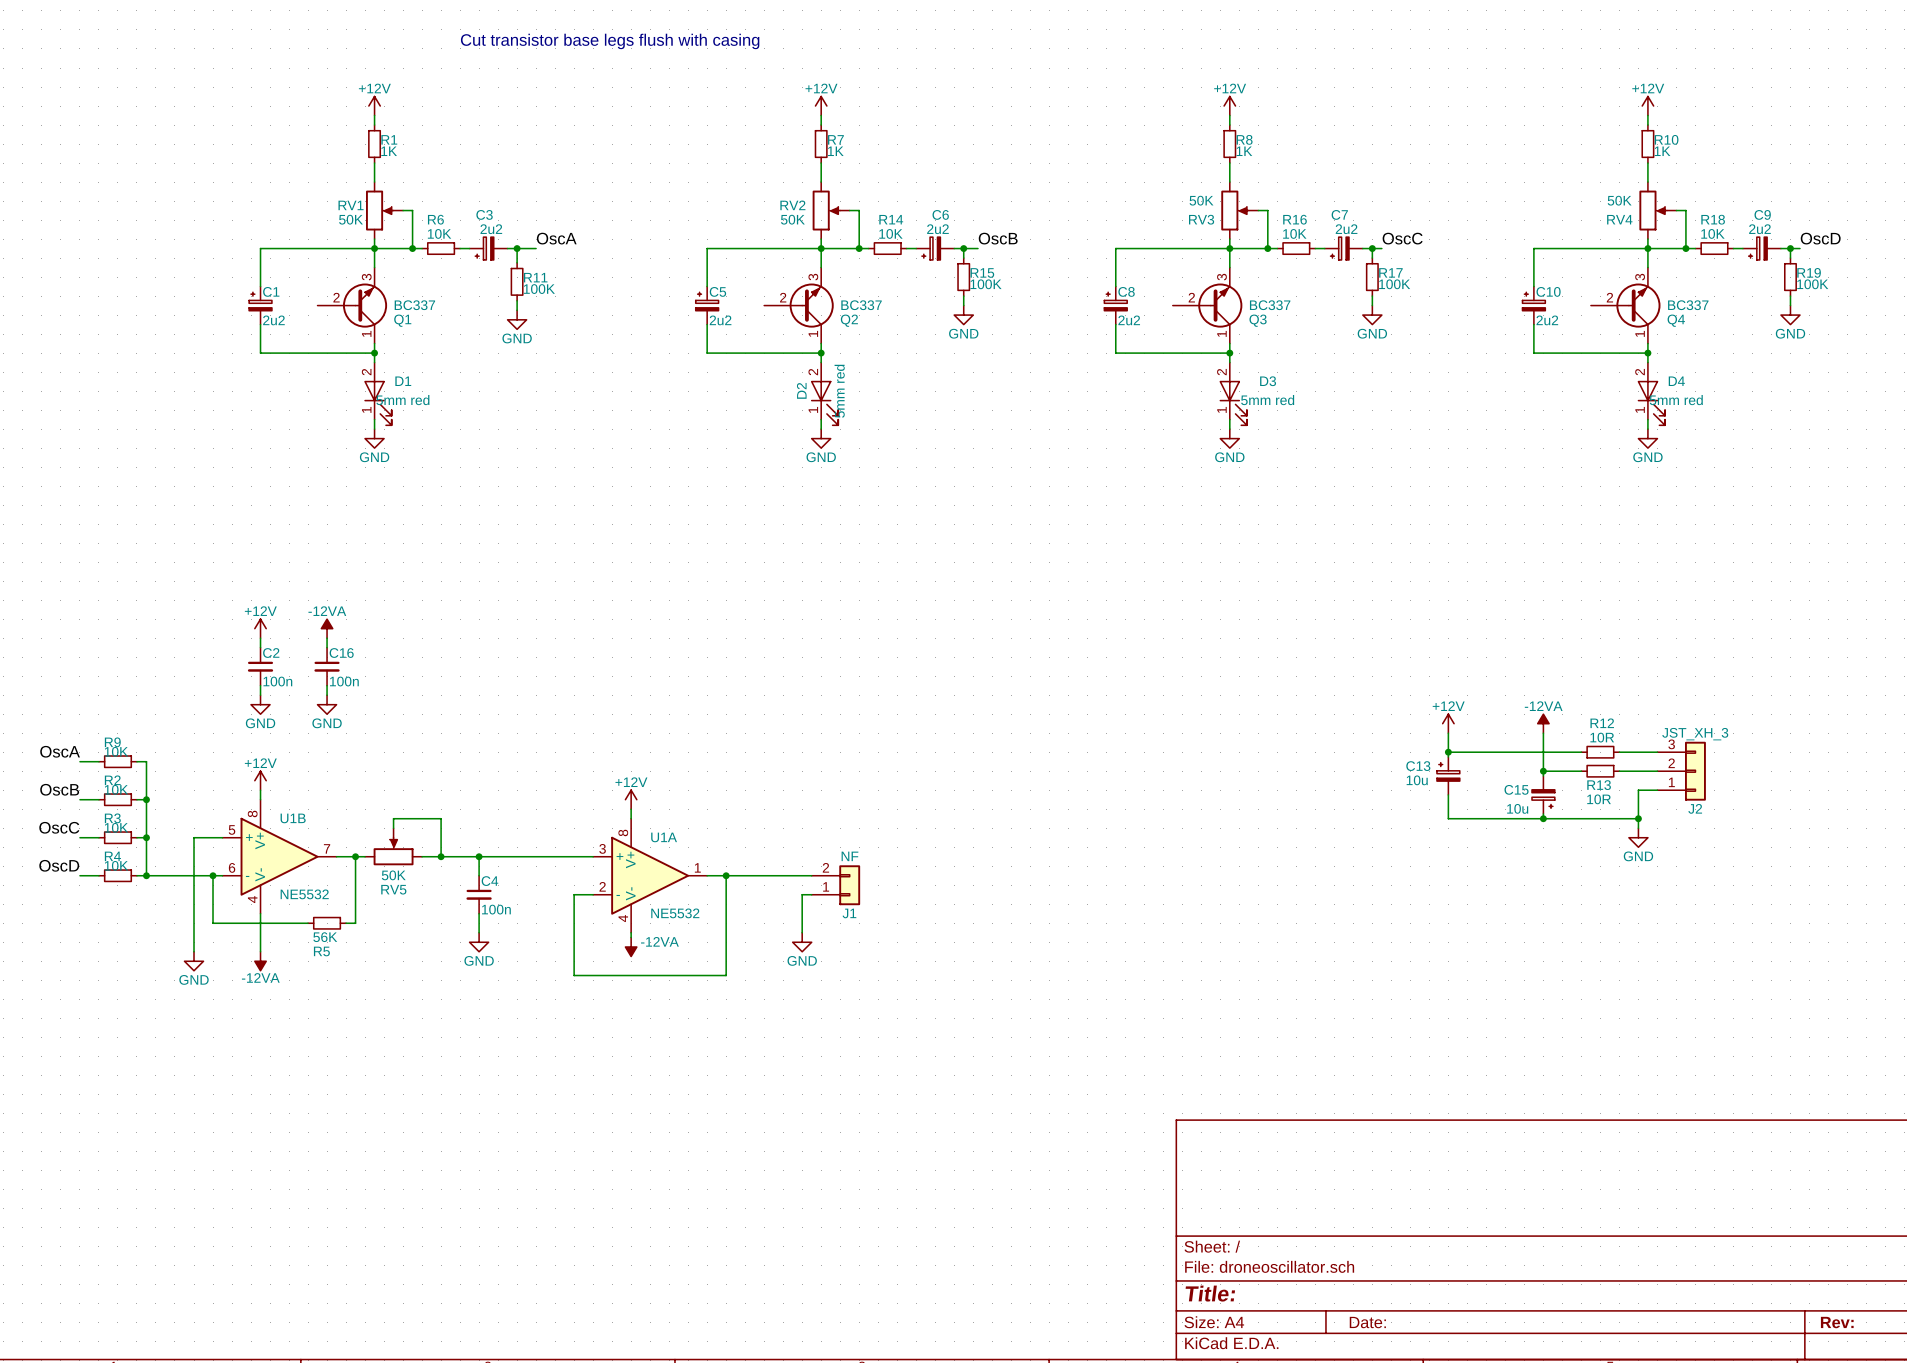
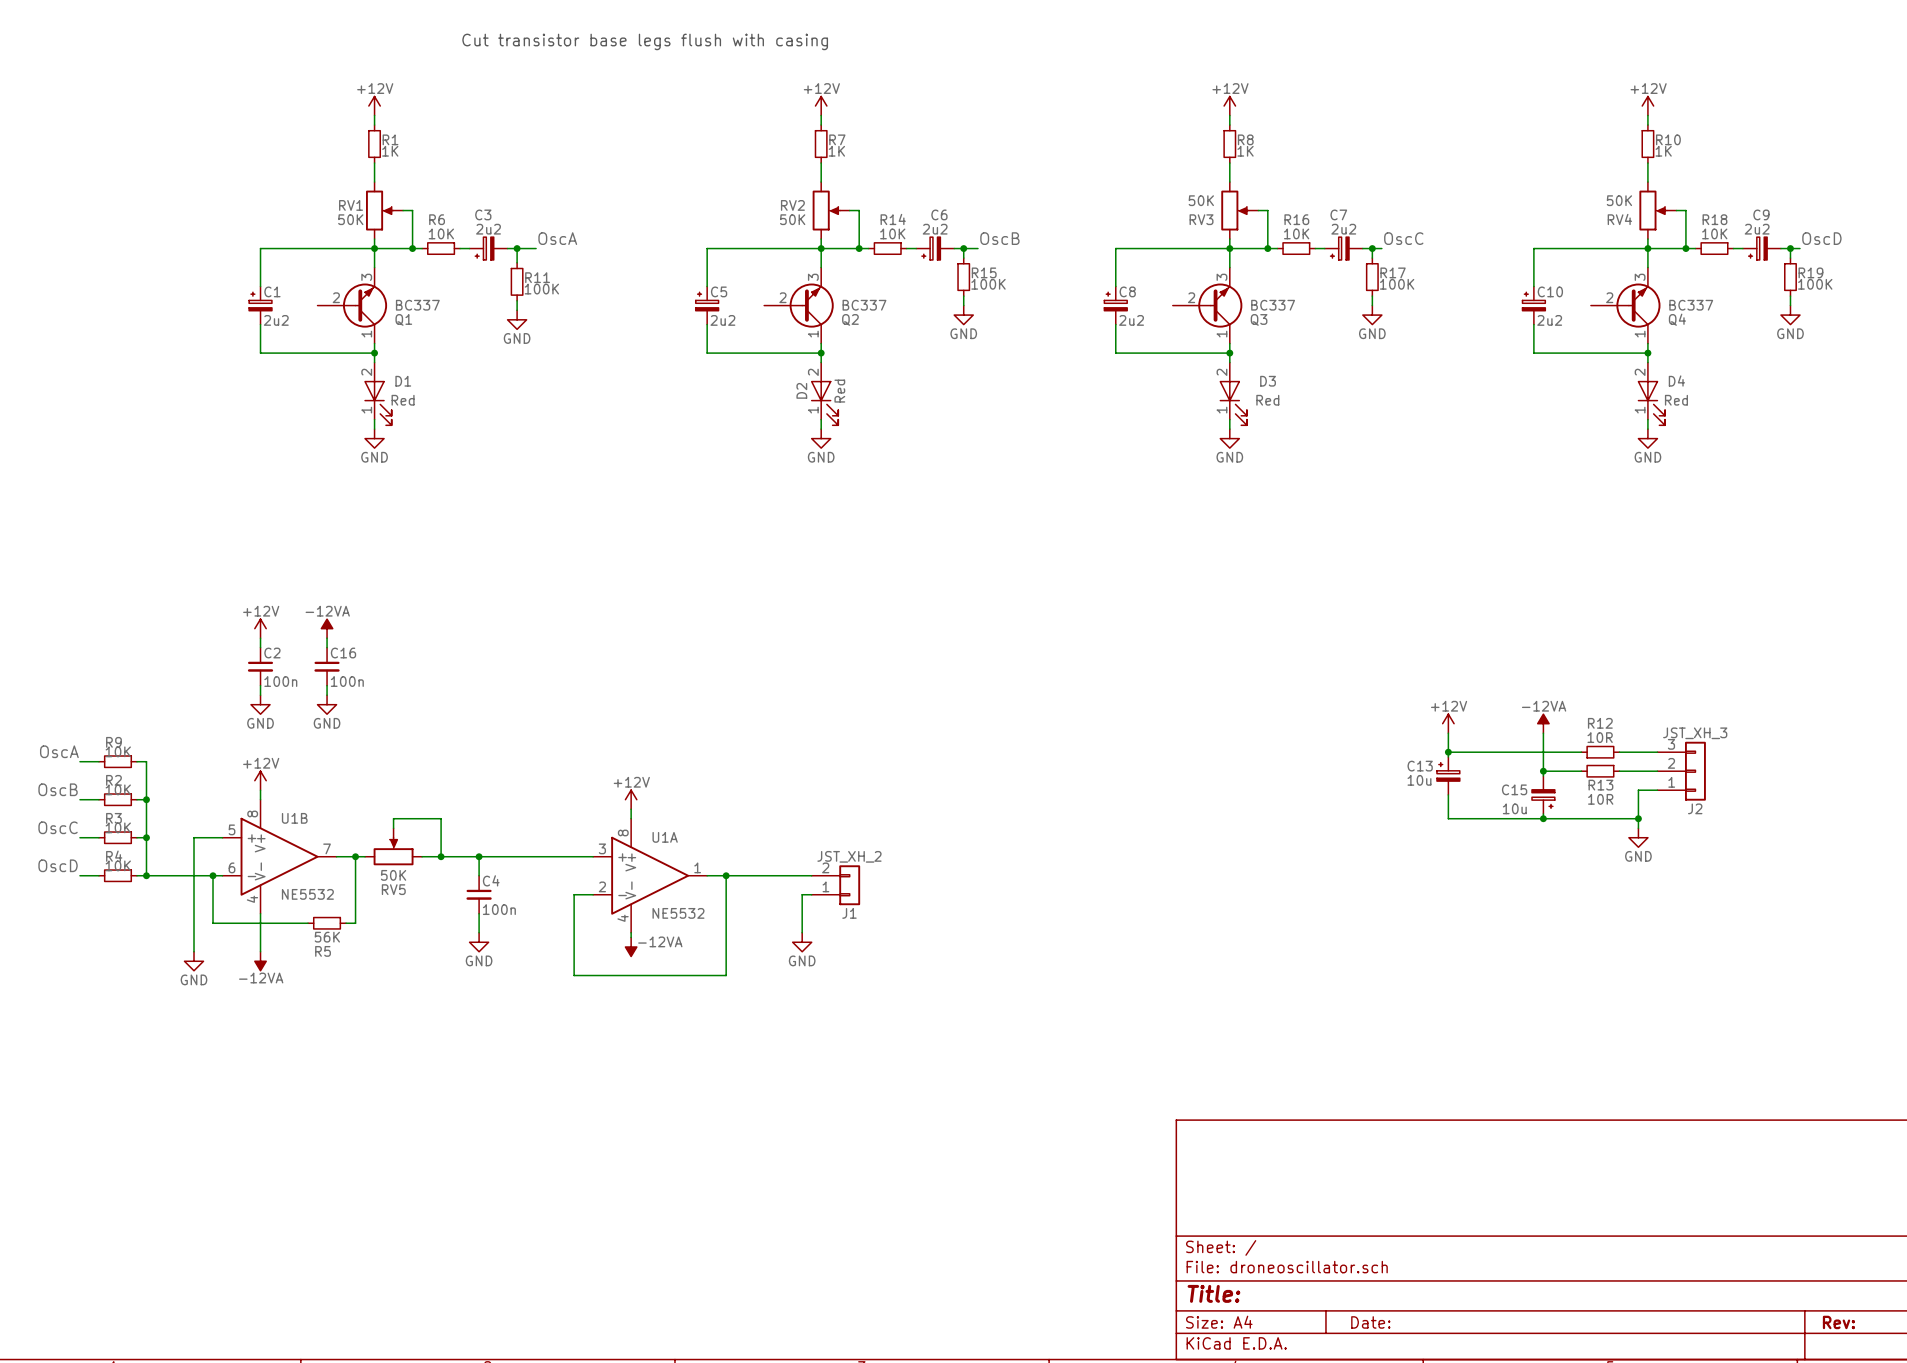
D2 value: 5mm red (839, 391) -> Red (839, 391)
D1 value: 5mm red (402, 400) -> Red (403, 400)
D3 value: 5mm red (1267, 400) -> Red (1267, 400)
D4 value: 5mm red (1676, 400) -> Red (1676, 400)
J1 value: NF (849, 856) -> JST_XH_2 (849, 856)

